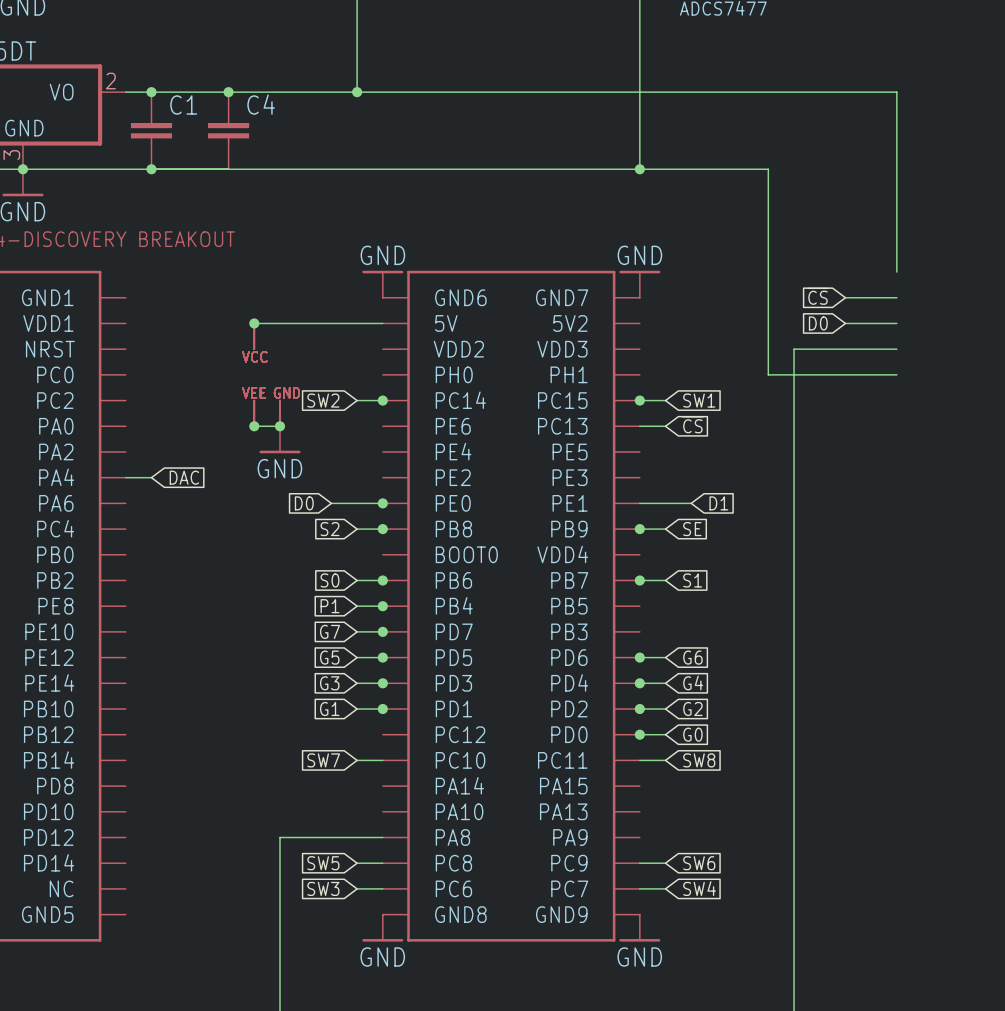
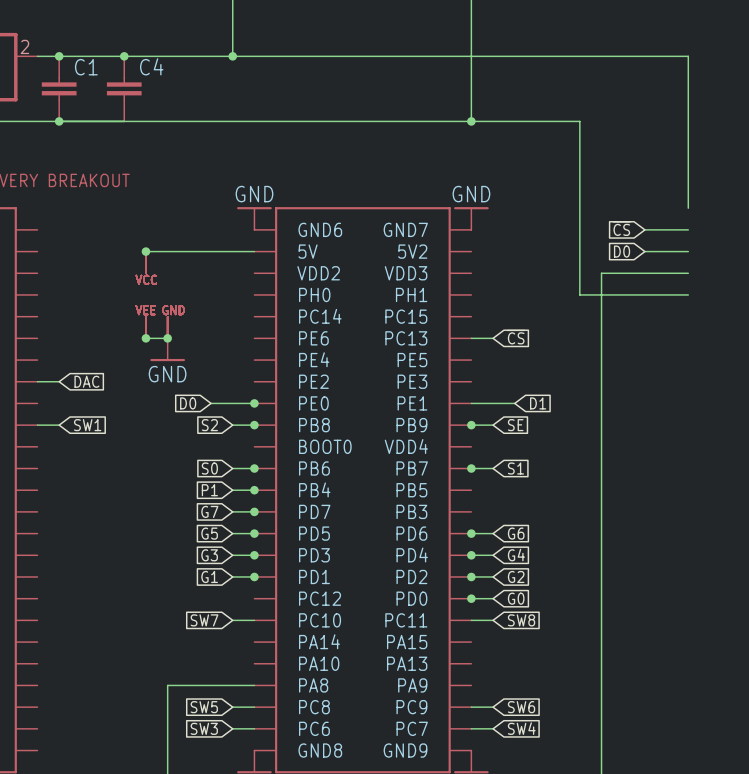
global label: SW2 (323, 400) -> none
wire: (357, 400) (382, 400) -> none
junction: (382, 400) -> none
wire: (639, 400) (665, 400) -> none
junction: (639, 400) -> none
global label: SW1 (699, 400) -> none
wire: none -> (37, 425) (59, 425)
global label: none -> SW1 (87, 425)

